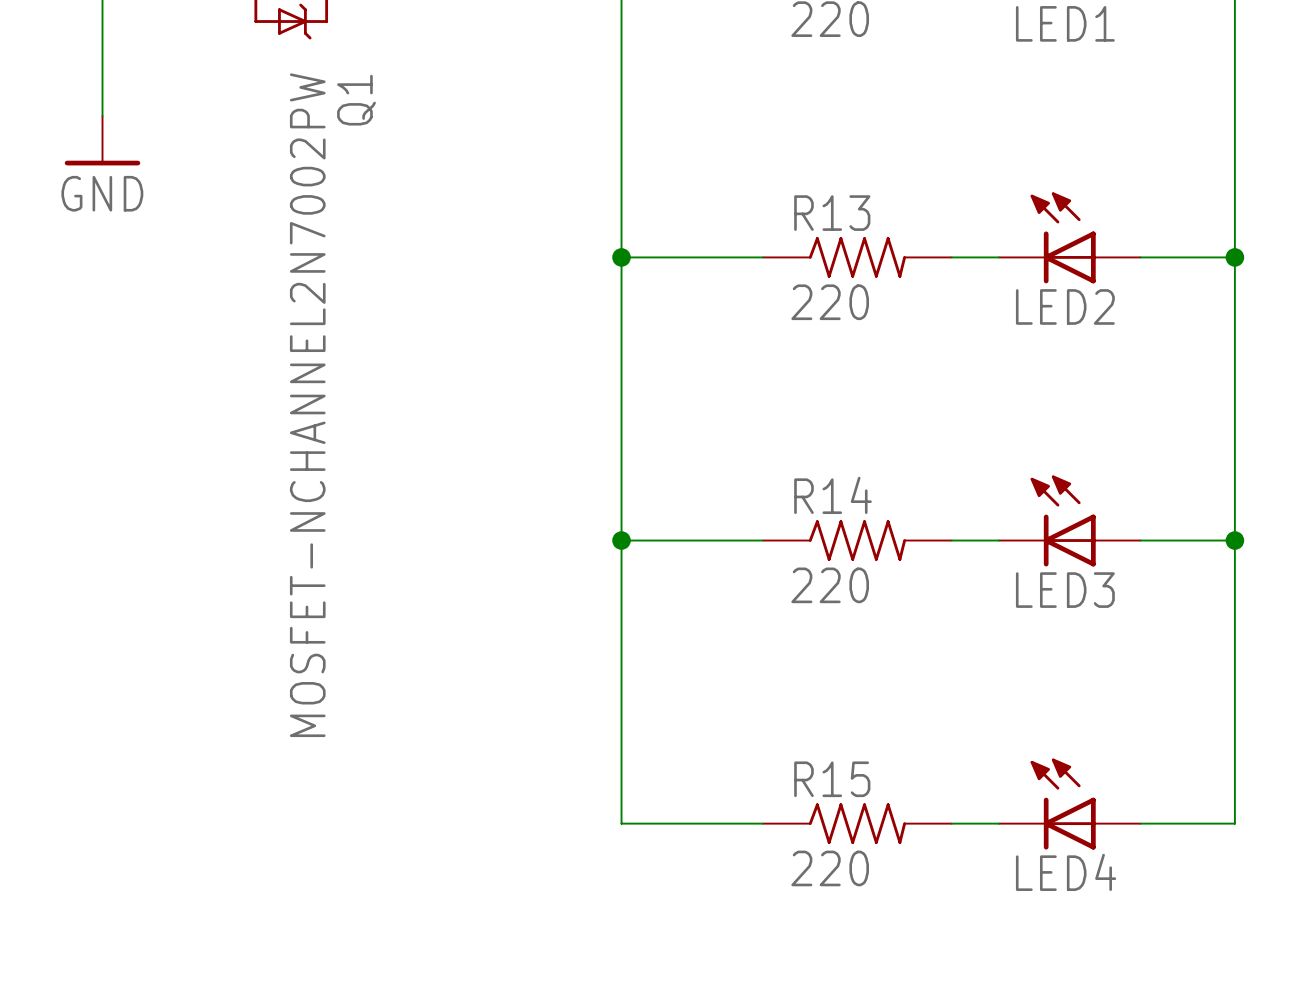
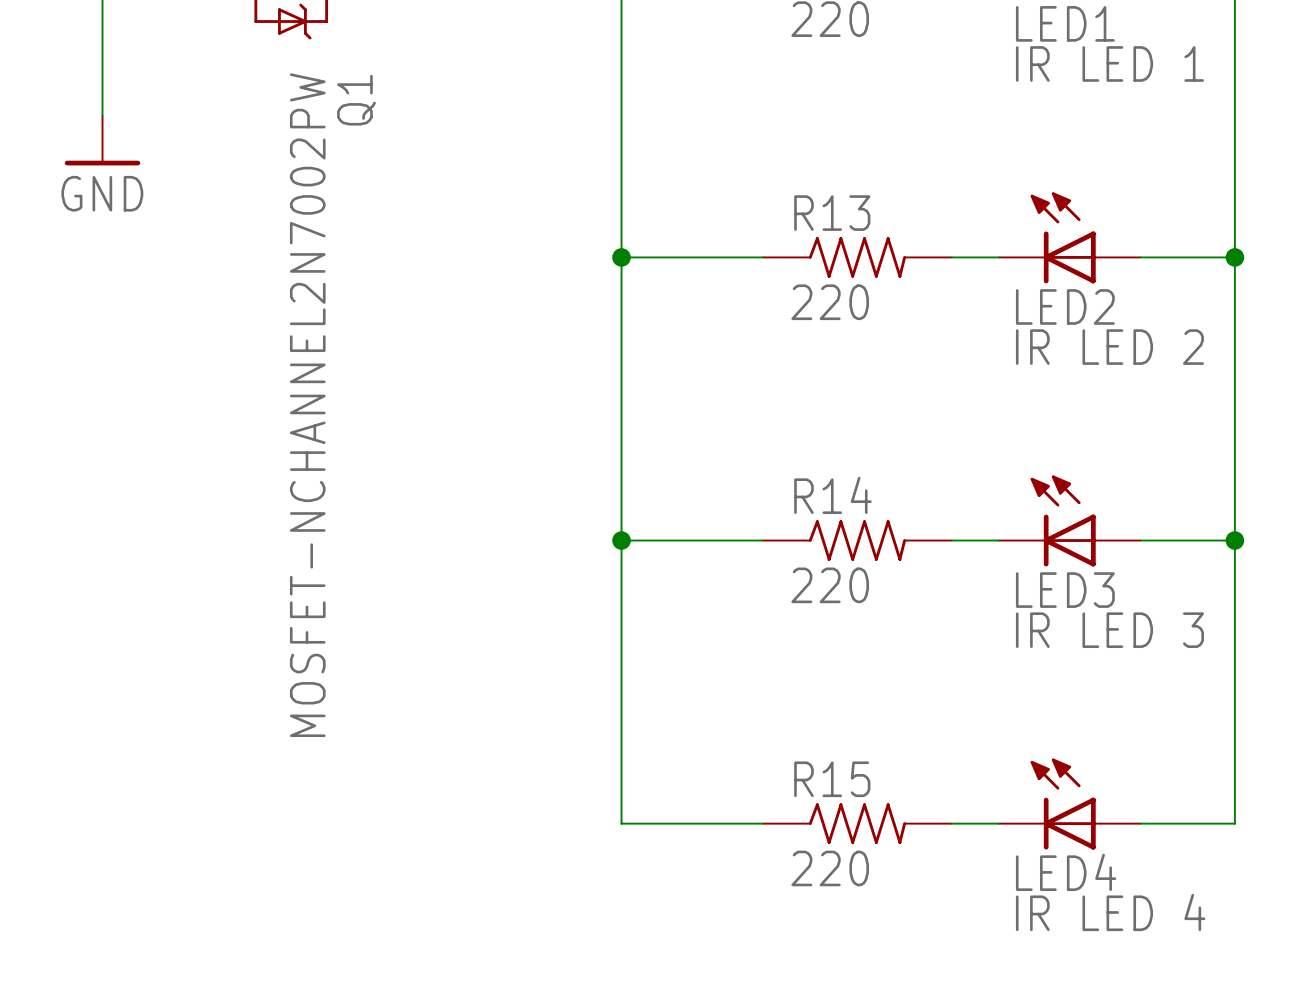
LED1 value: none -> IR LED 1 (1109, 63)
LED2 value: none -> IR LED 2 (1109, 347)
LED3 value: none -> IR LED 3 (1109, 630)
LED4 value: none -> IR LED 4 (1110, 912)

